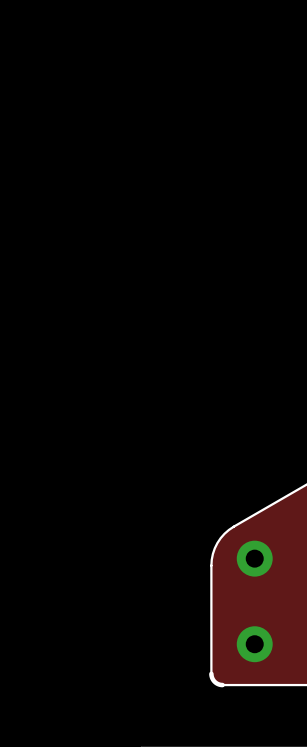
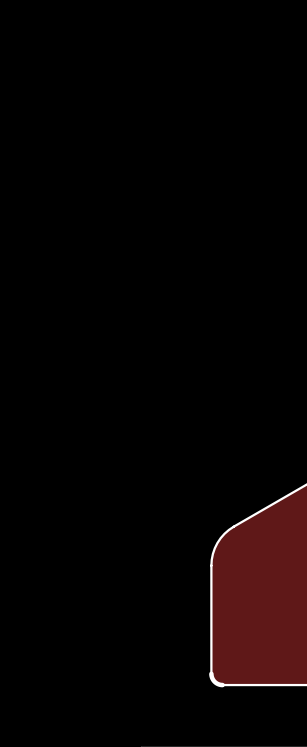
via: (254, 558) -> none
via: (254, 644) -> none

